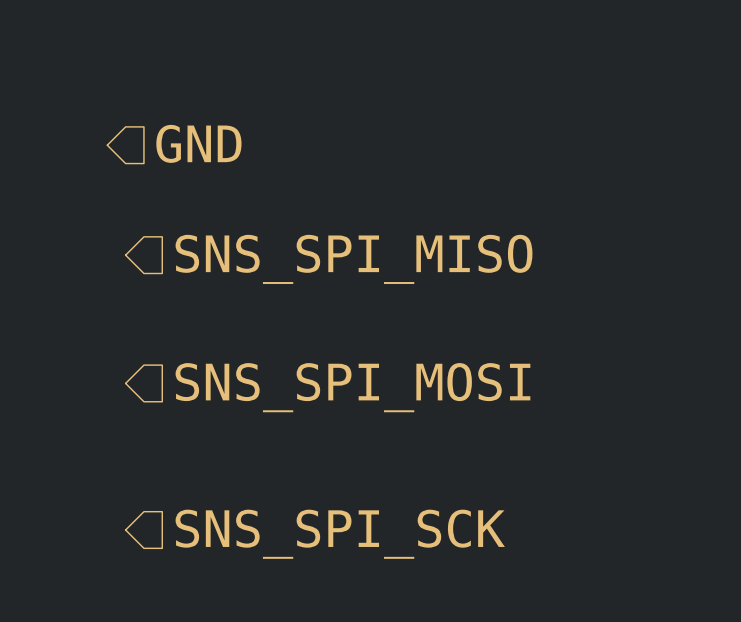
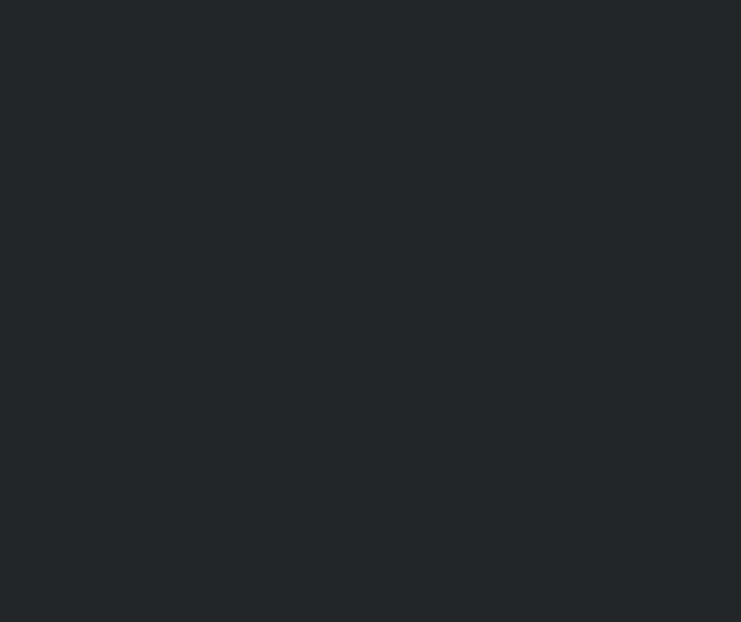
hierarchical label: GND (198, 143) -> none
hierarchical label: SNS_SPI_MISO (354, 259) -> none
hierarchical label: SNS_SPI_MOSI (352, 387) -> none
hierarchical label: SNS_SPI_SCK (340, 534) -> none

